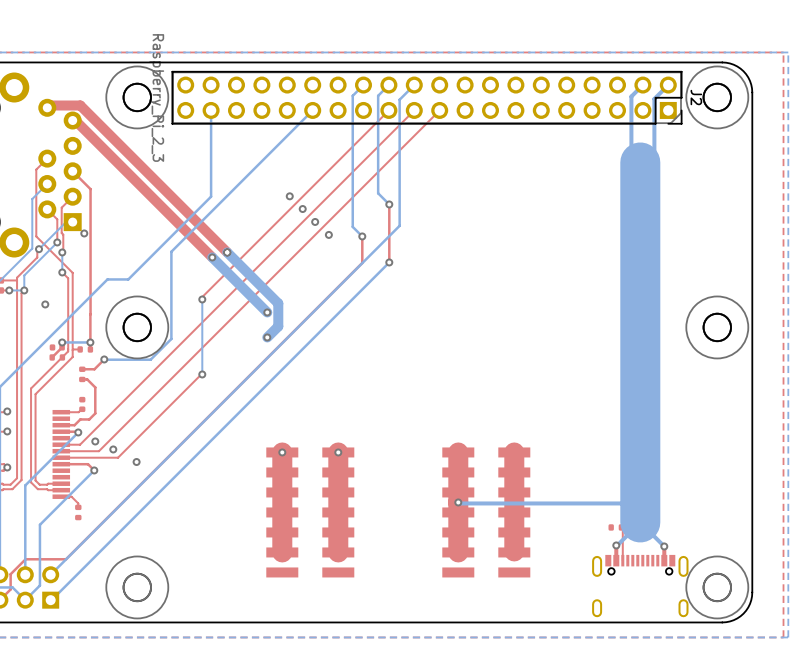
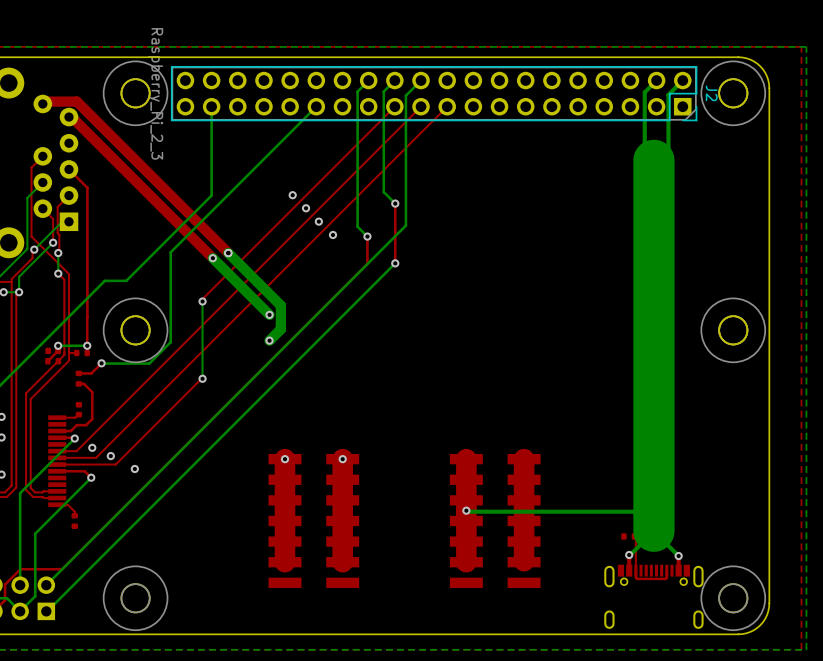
via: (84, 233) -> none
via: (45, 304) -> none
top track: none -> (666, 570) (665, 578) (637, 578) (635, 570)

